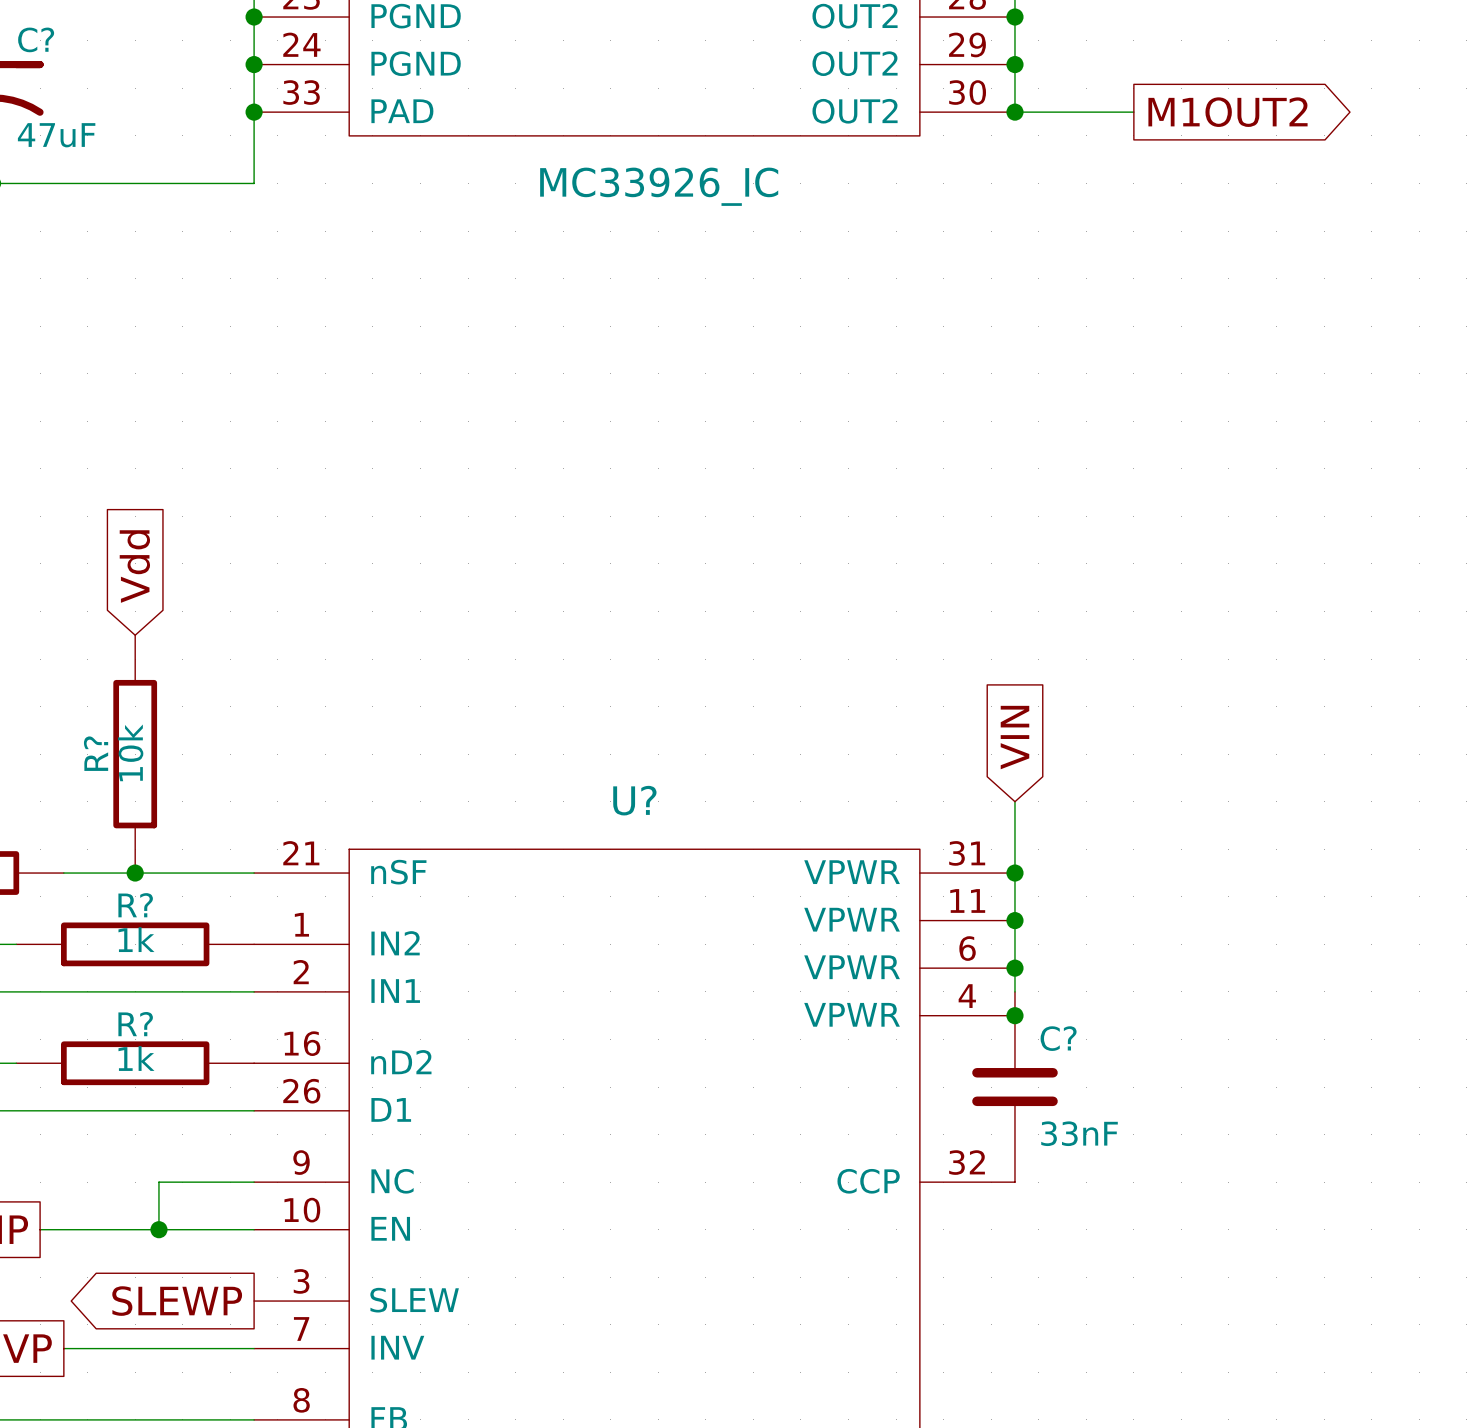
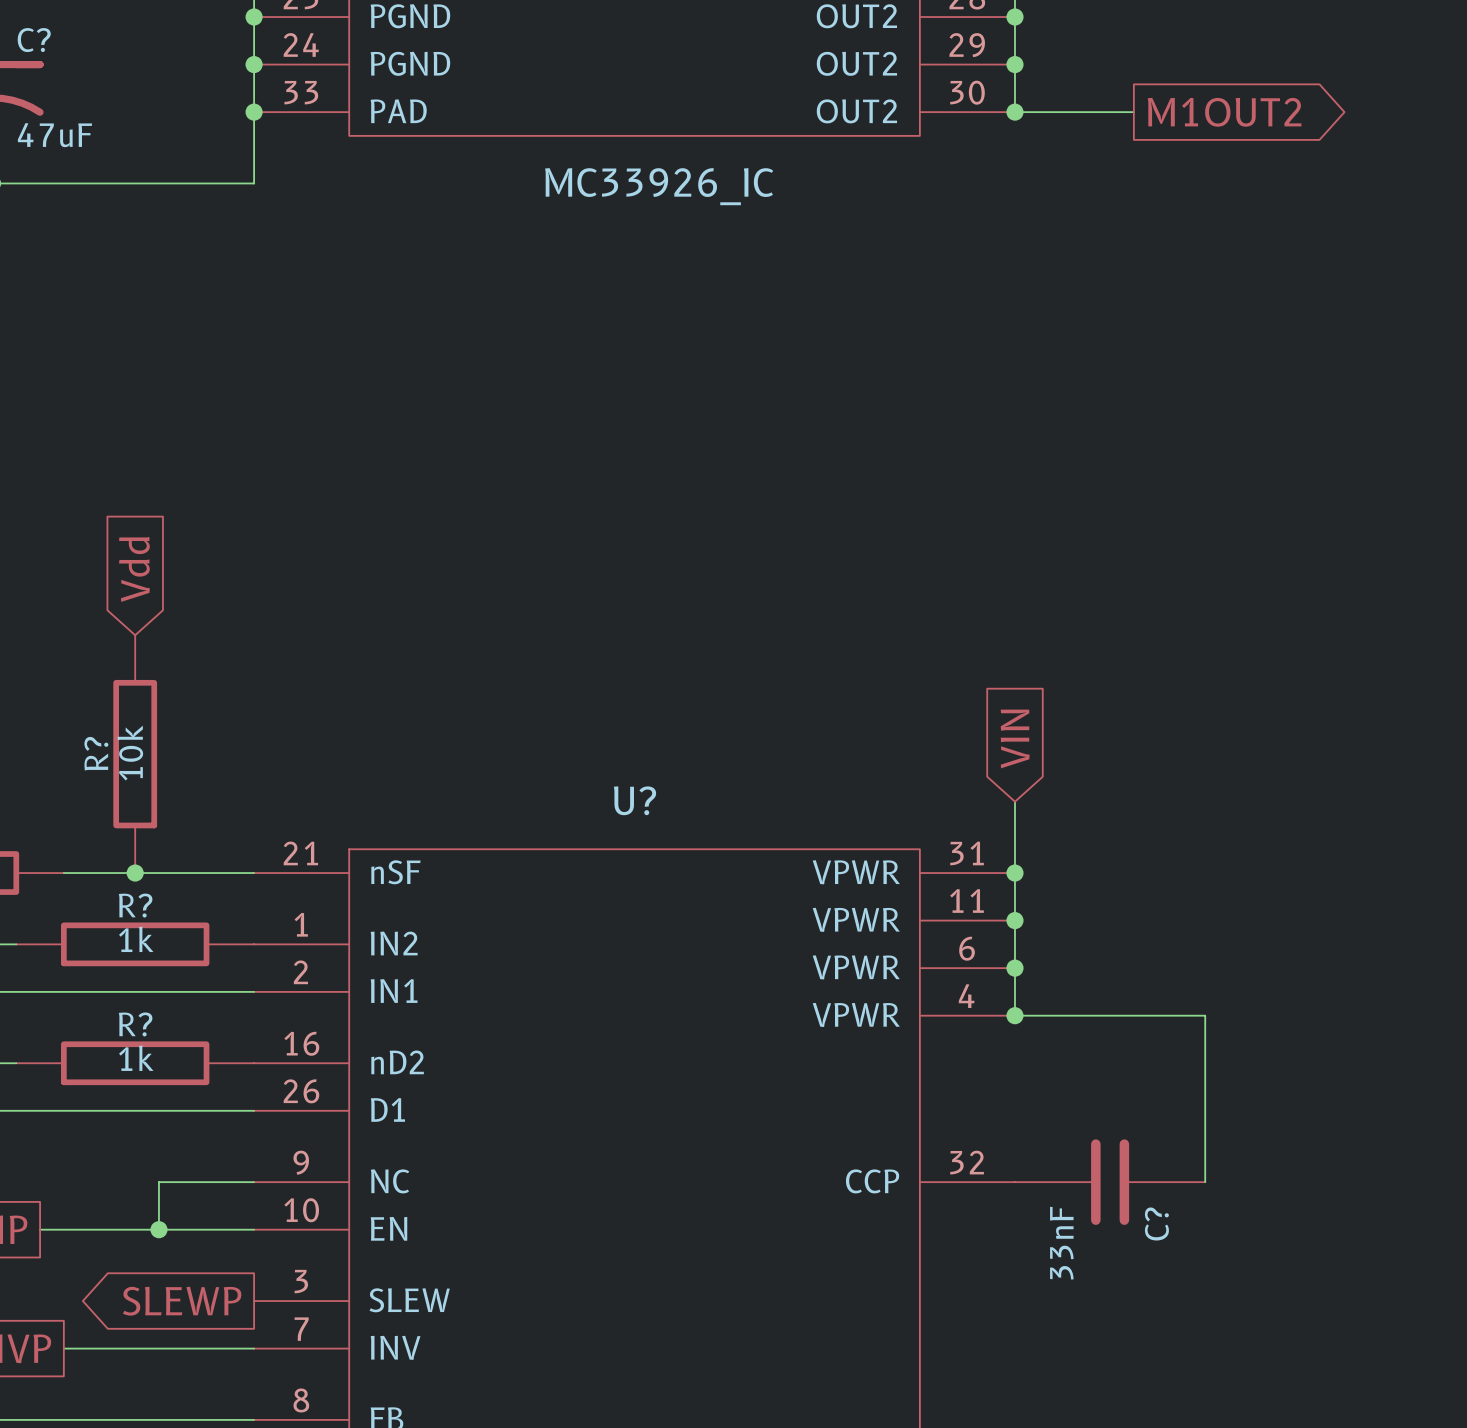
wire: none -> (1014, 991) (1014, 1015) (1205, 1015) (1205, 1182)
C? rotation: 0° (1014, 1087) -> 90° clockwise (1110, 1182)
C? position: (1014, 1087) -> (1110, 1182)

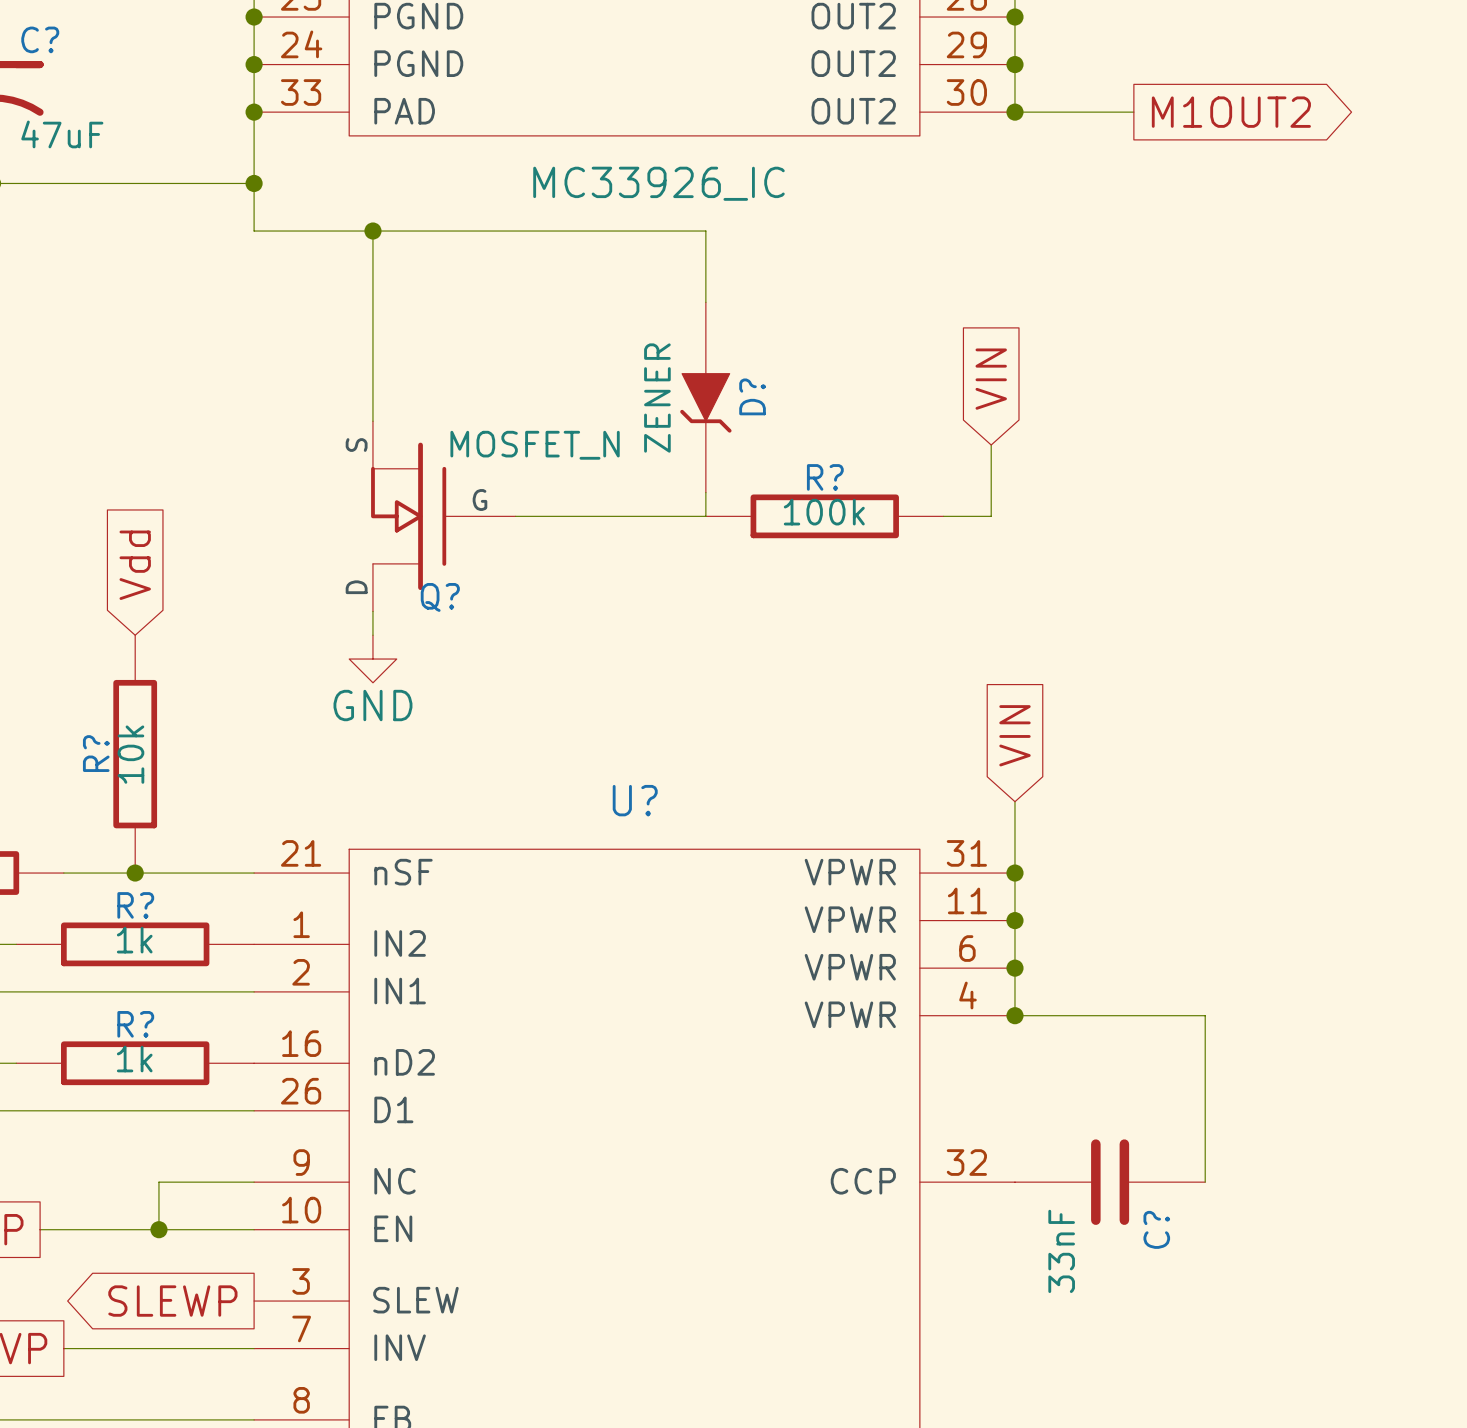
wire: none -> (254, 183) (254, 231) (705, 231) (705, 302)
junction: none -> (254, 183)
wire: none -> (372, 231) (372, 421)
junction: none -> (372, 231)
global label: none -> VIN (991, 379)
D?: none -> ZENER (705, 397)
wire: none -> (991, 445) (991, 516) (943, 516)
wire: none -> (705, 492) (705, 516) (515, 516)
Q?: none -> MOSFET_N (443, 516)
R?: none -> 100k (824, 516)
wire: none -> (372, 611) (372, 635)
power symbol: none -> GND (372, 659)

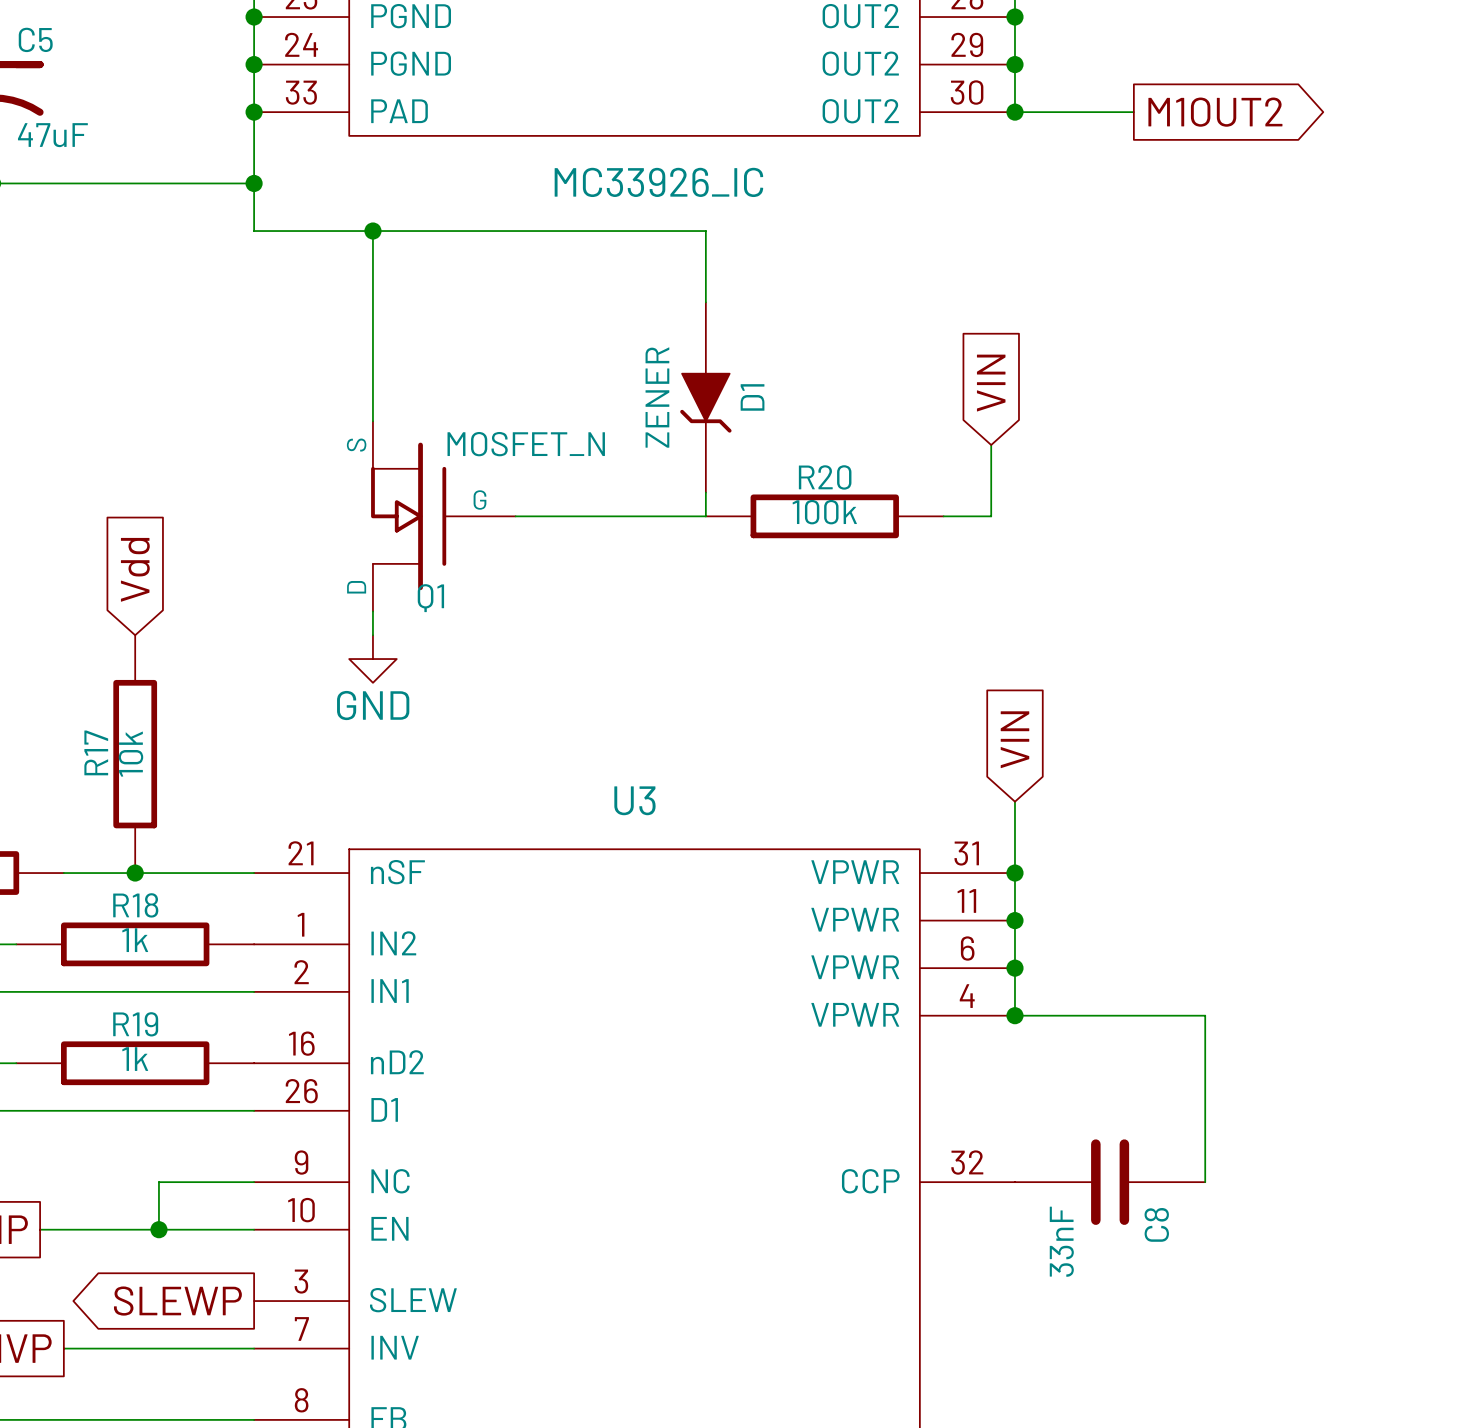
C? name: C? (40, 39) -> C5 (35, 39)
D? name: D? (752, 396) -> D1 (752, 397)
R? name: R? (825, 477) -> R20 (825, 477)
Q? name: Q? (440, 597) -> Q1 (430, 598)
R? name: R? (96, 753) -> R17 (96, 752)
U? name: U? (635, 800) -> U3 (634, 800)
R? name: R? (135, 905) -> R18 (135, 905)
R? name: R? (135, 1024) -> R19 (135, 1024)
C? name: C? (1156, 1229) -> C8 (1156, 1224)

